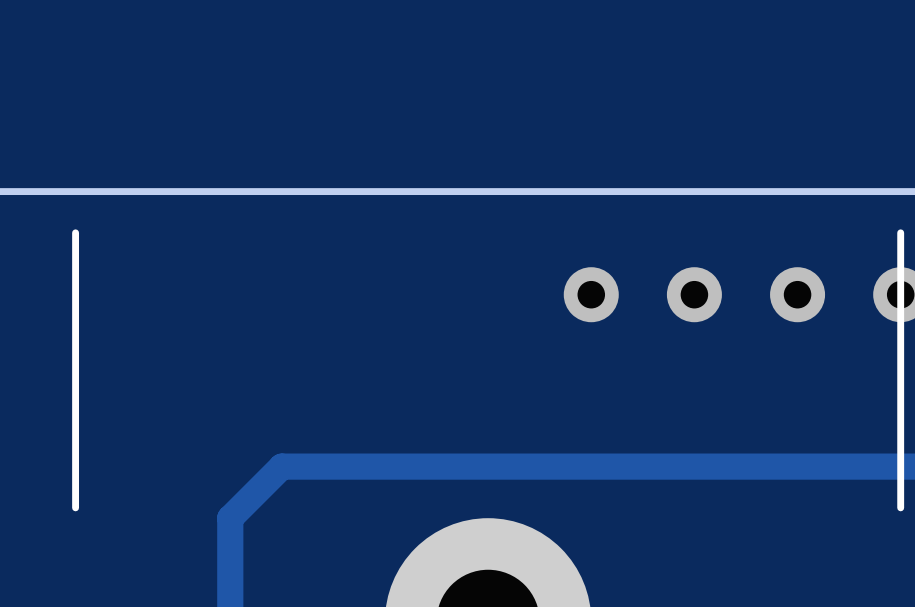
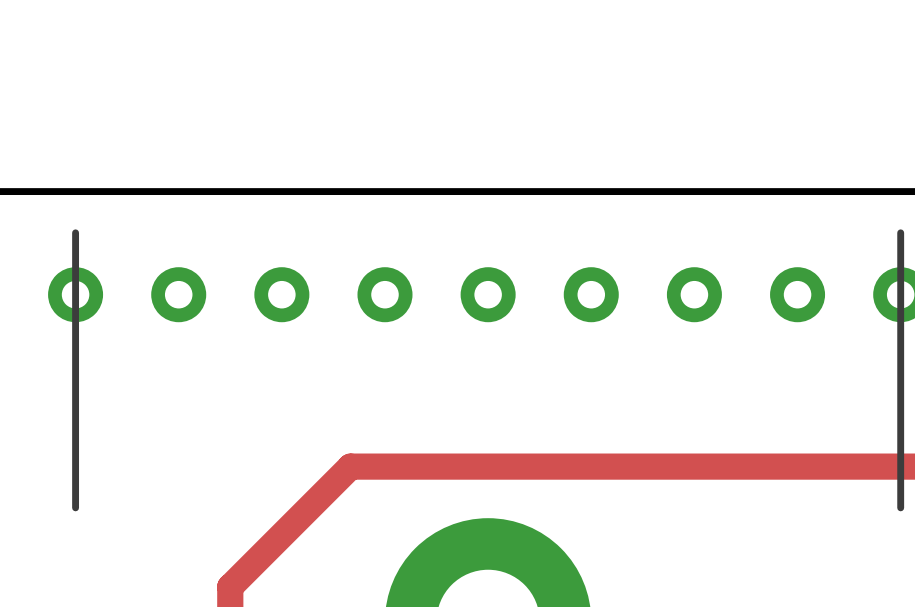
via: none -> (75, 294)
via: none -> (178, 294)
via: none -> (281, 294)
via: none -> (384, 294)
via: none -> (488, 294)
track: (350, 466) (281, 466) (230, 518) (230, 586) -> (350, 466) (230, 586)

